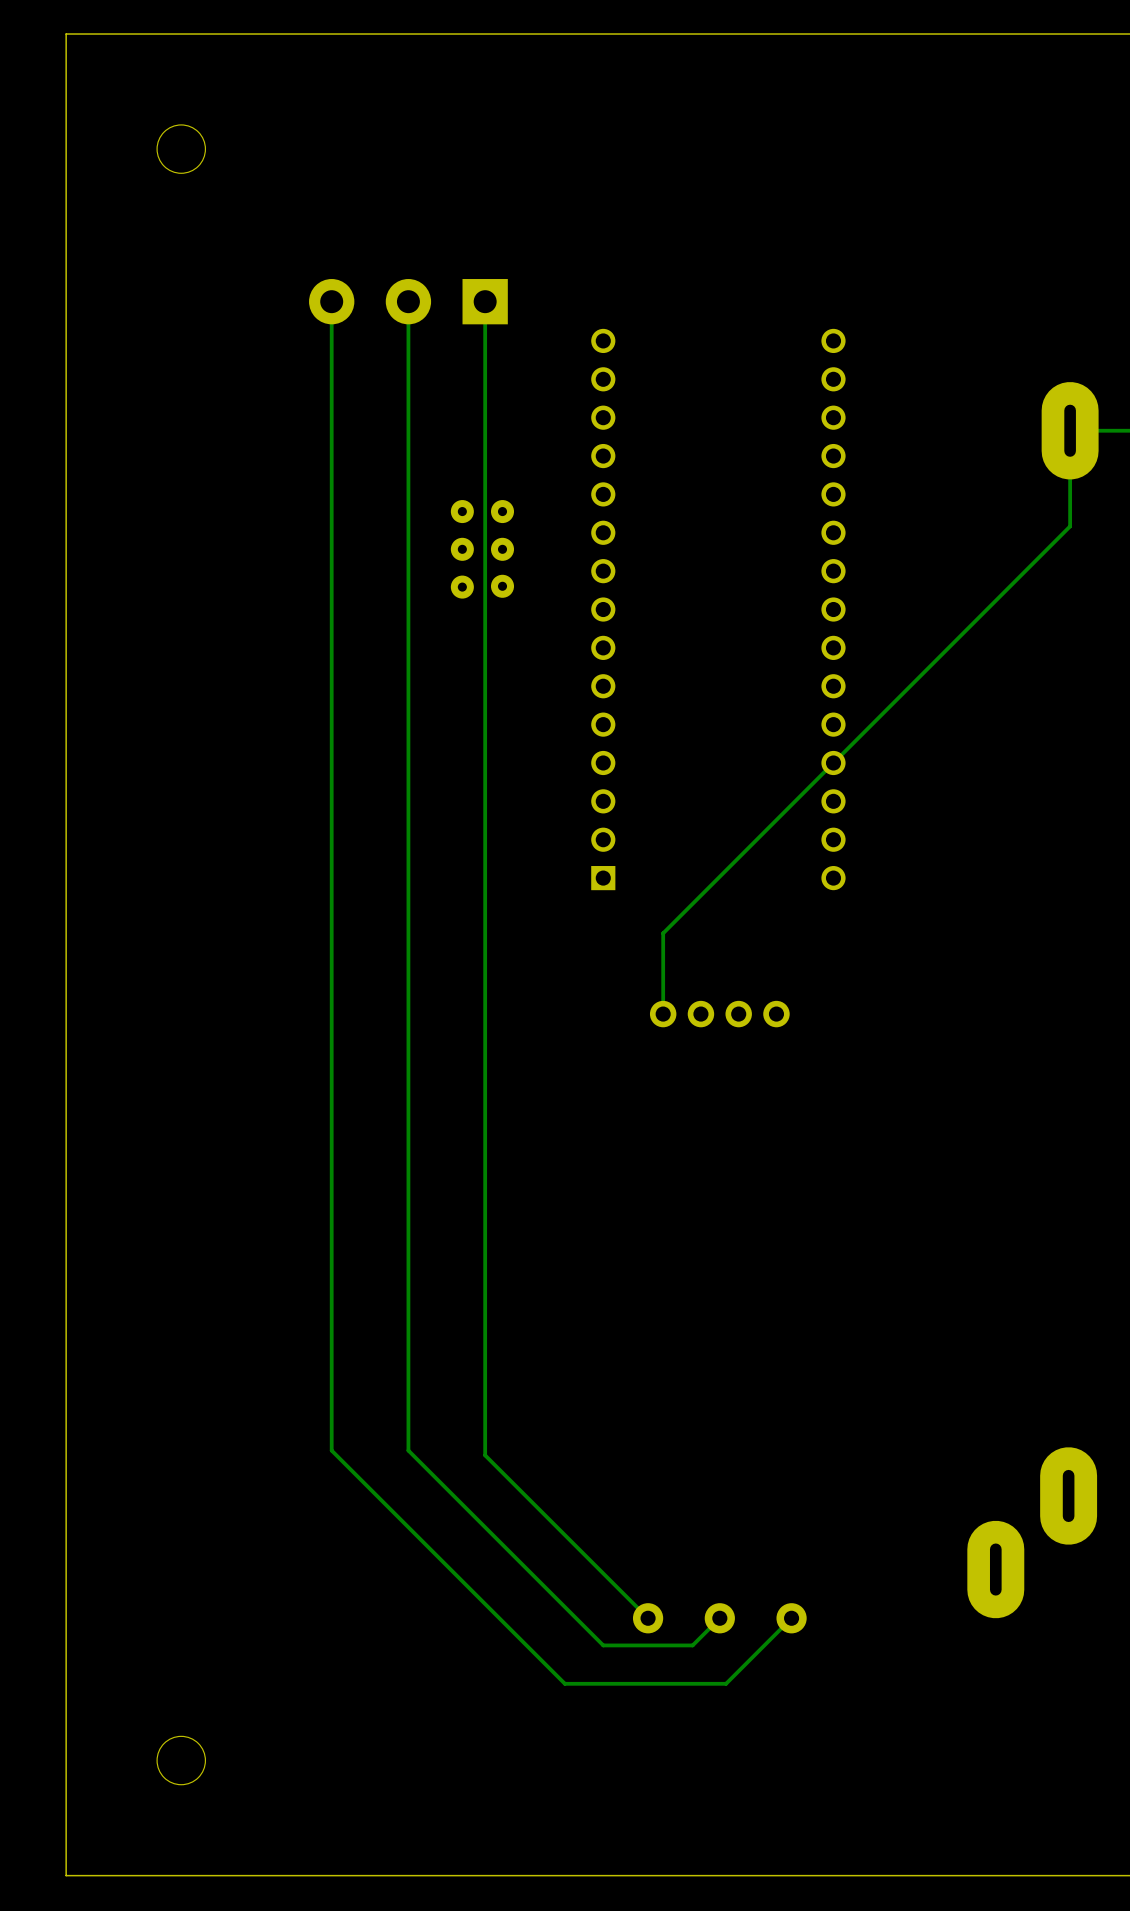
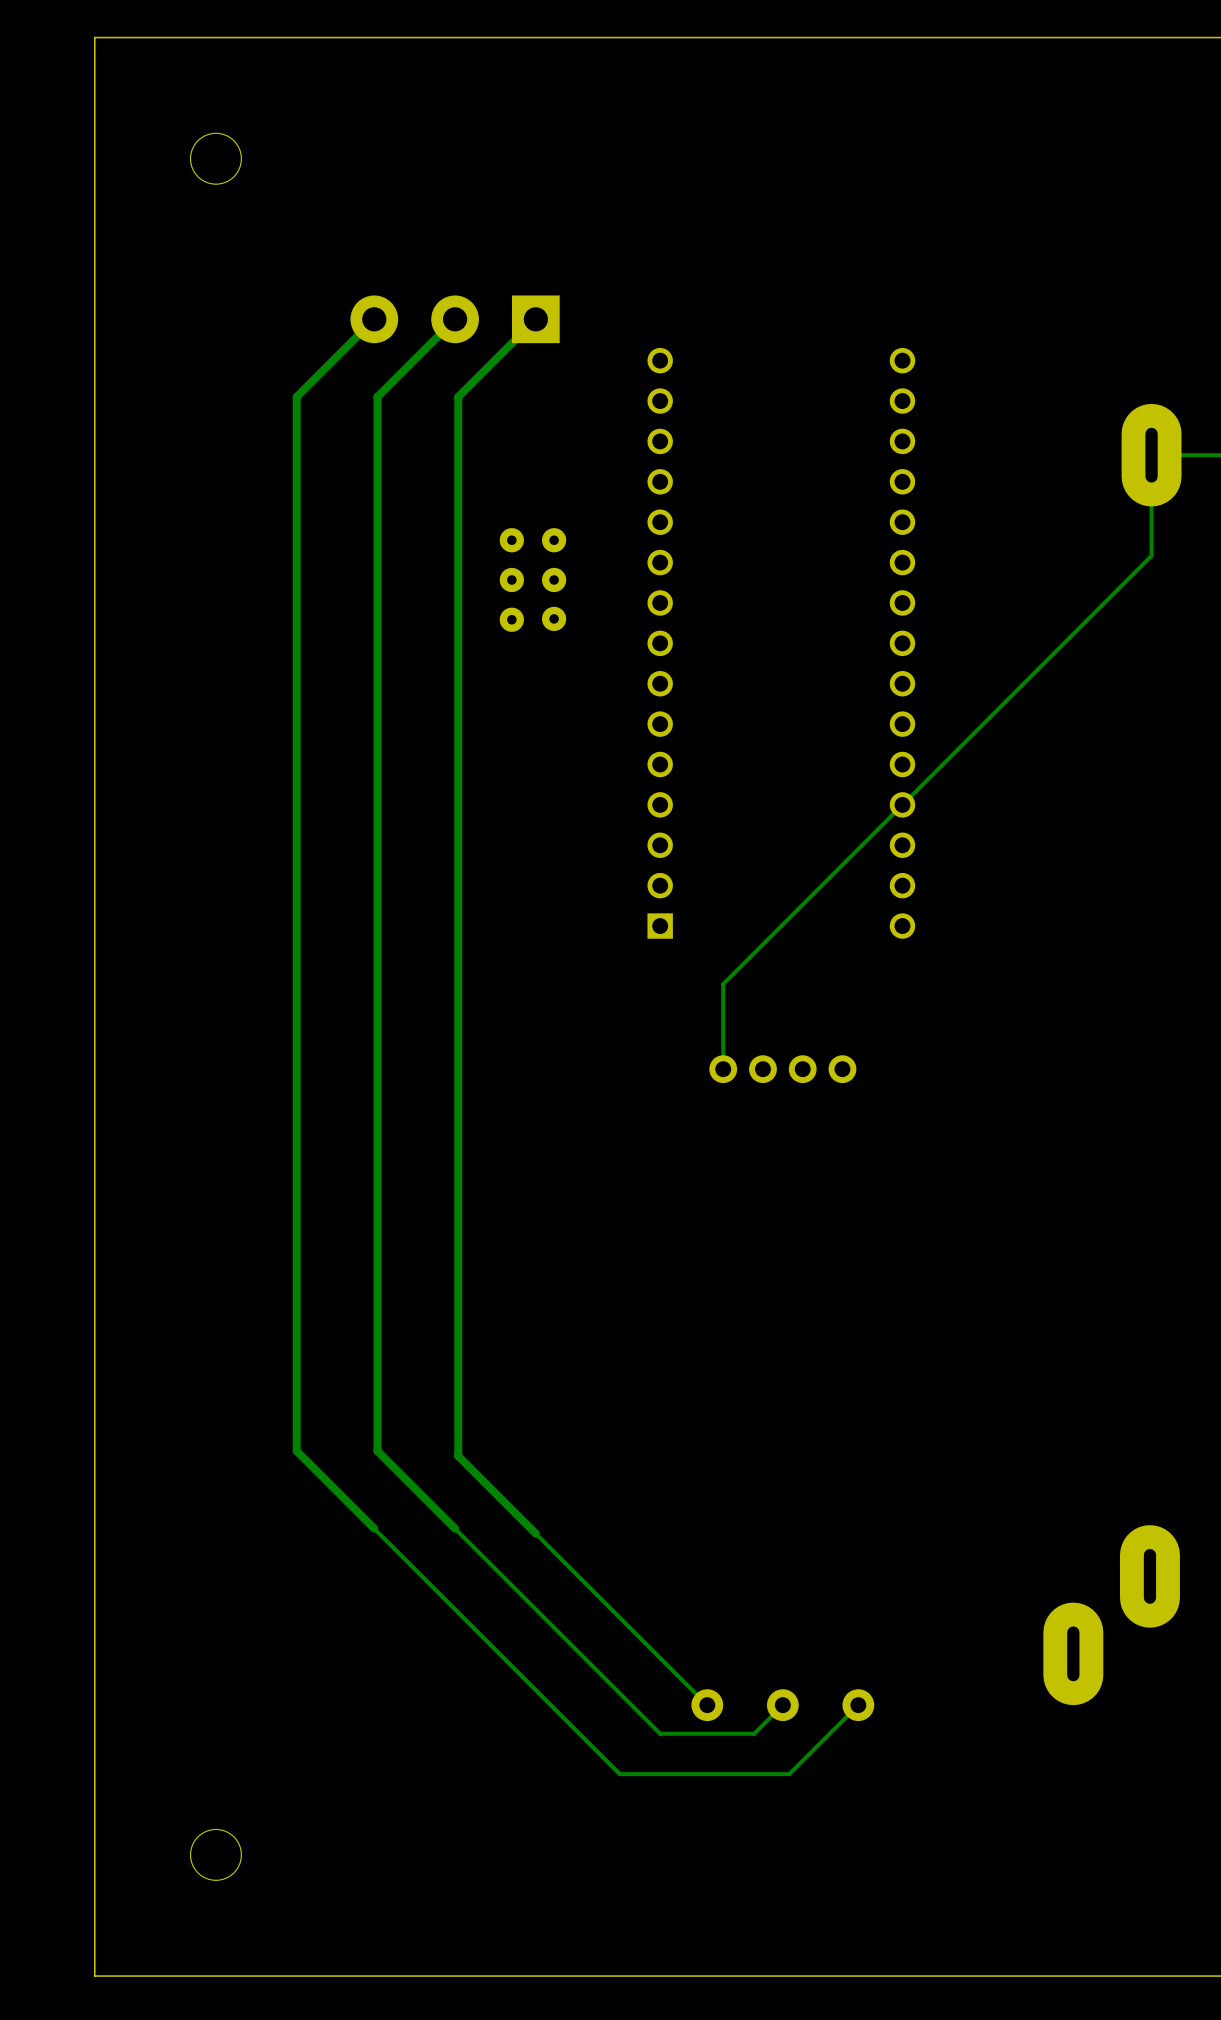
track: (331, 301) (331, 1450) -> (374, 319) (296, 396) (296, 1451) (374, 1528)
track: (408, 301) (408, 1450) -> (455, 319) (377, 396) (377, 1451) (455, 1528)
track: (485, 301) (485, 1455) -> (535, 319) (458, 396) (458, 1456) (535, 1533)

